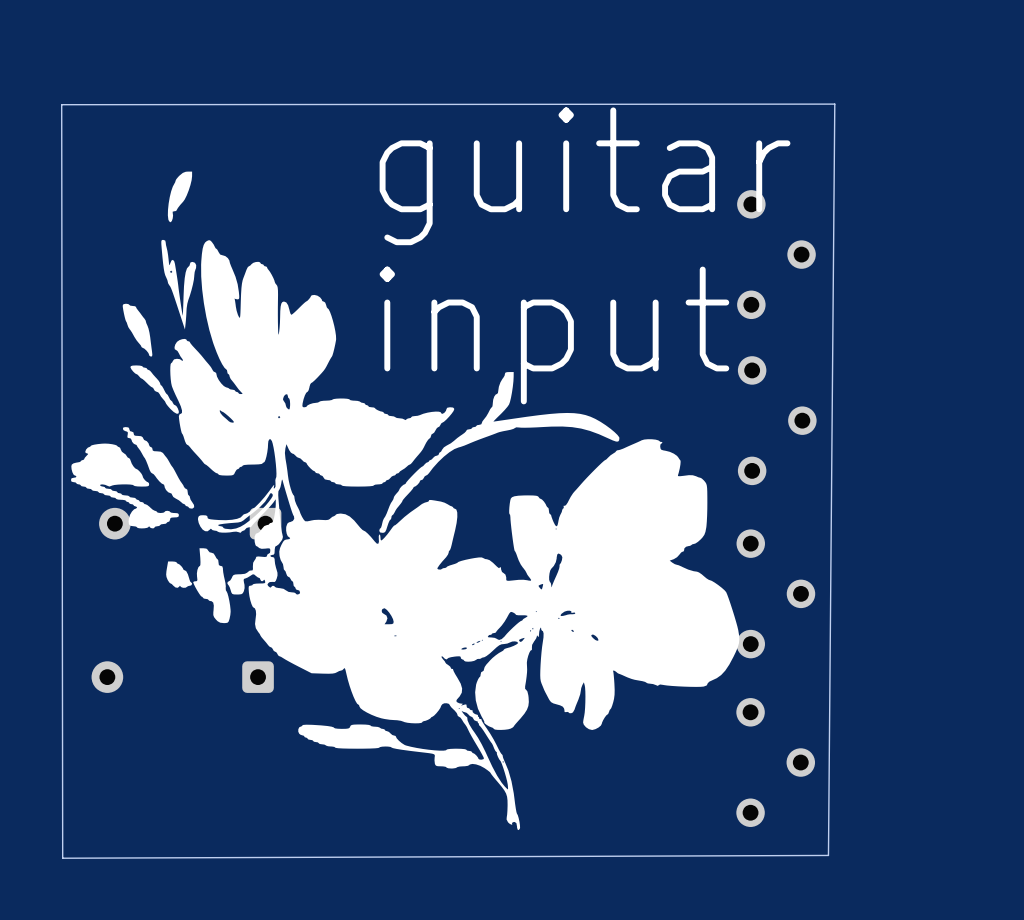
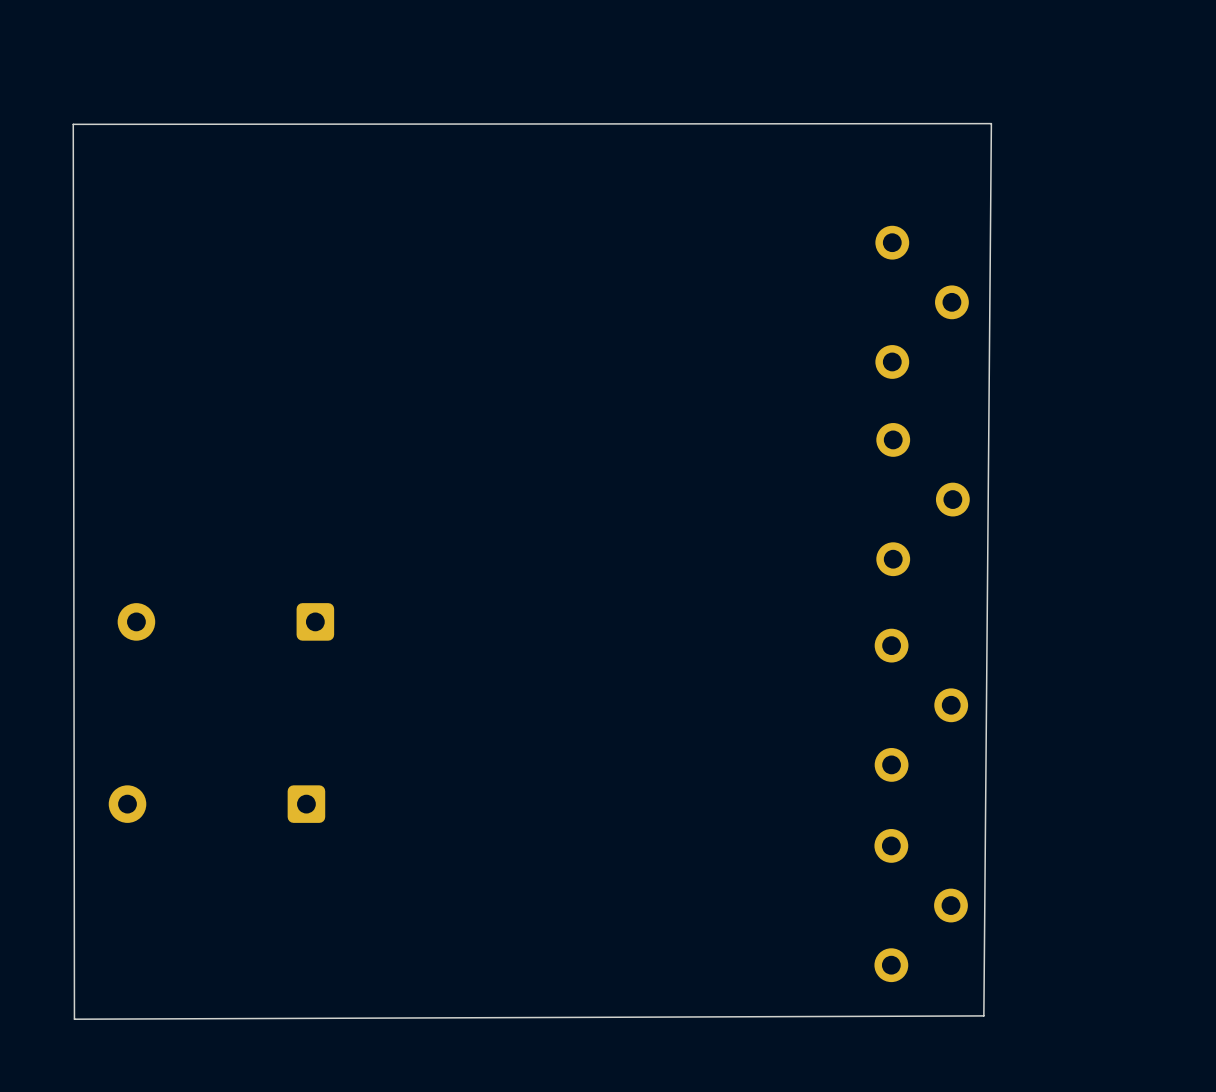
text: guitar (585, 176) -> none
text: input (554, 335) -> none
part: (405, 500) -> none

